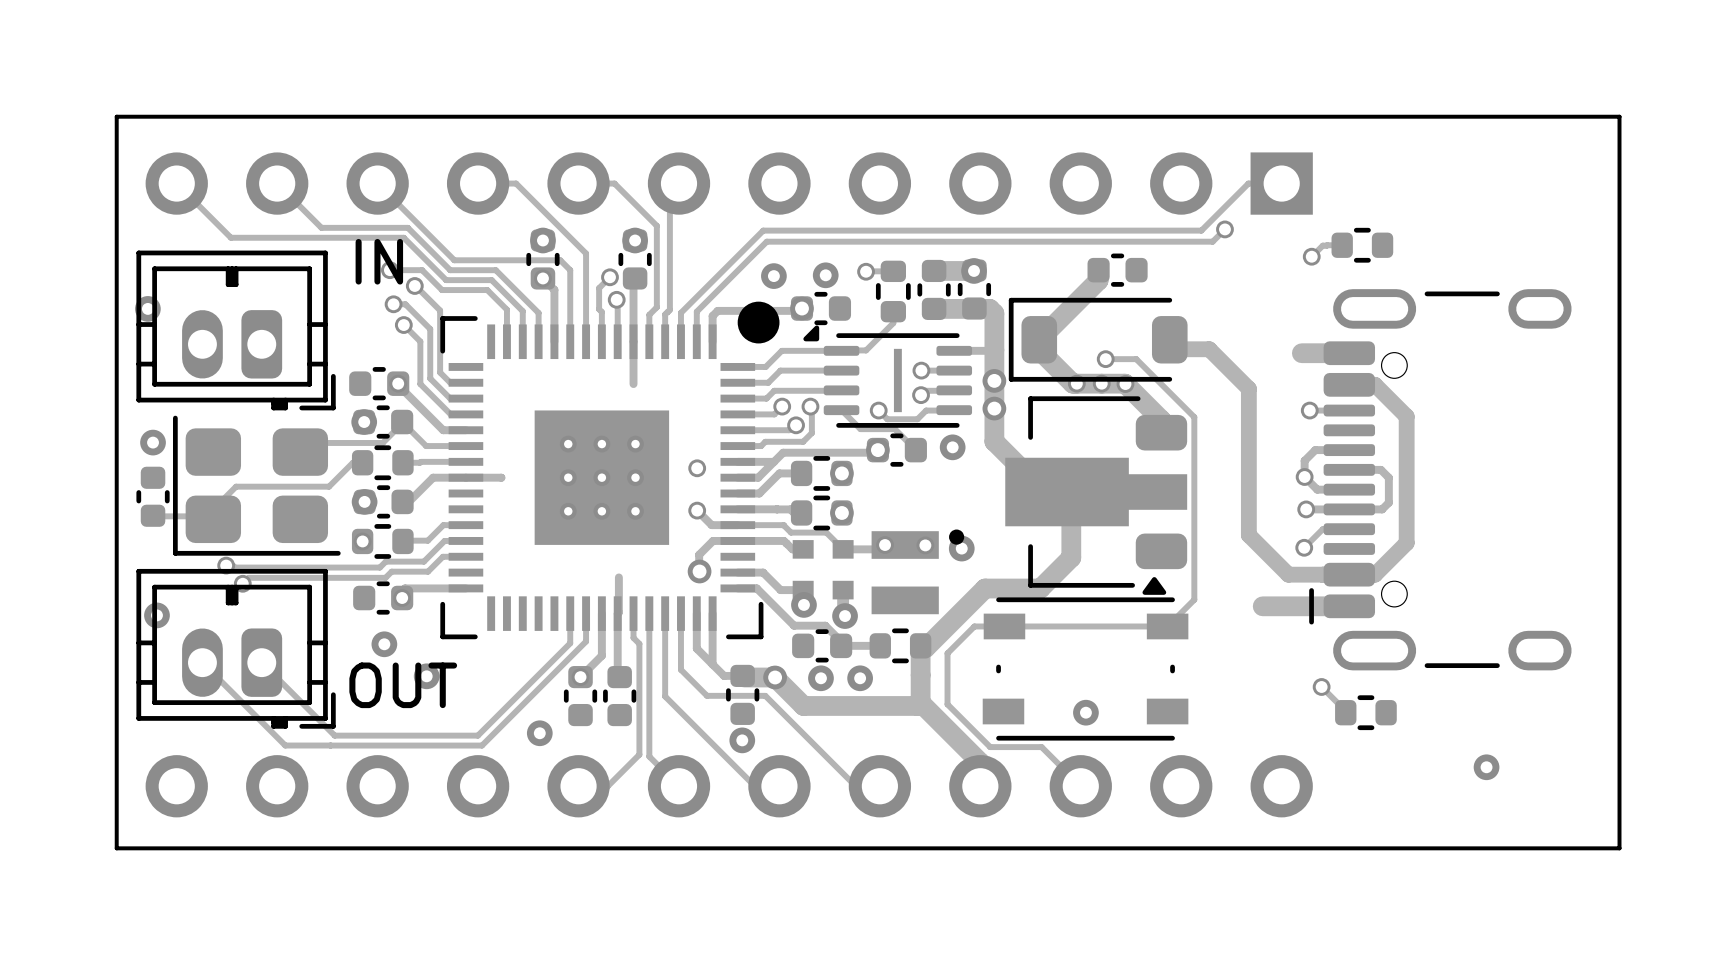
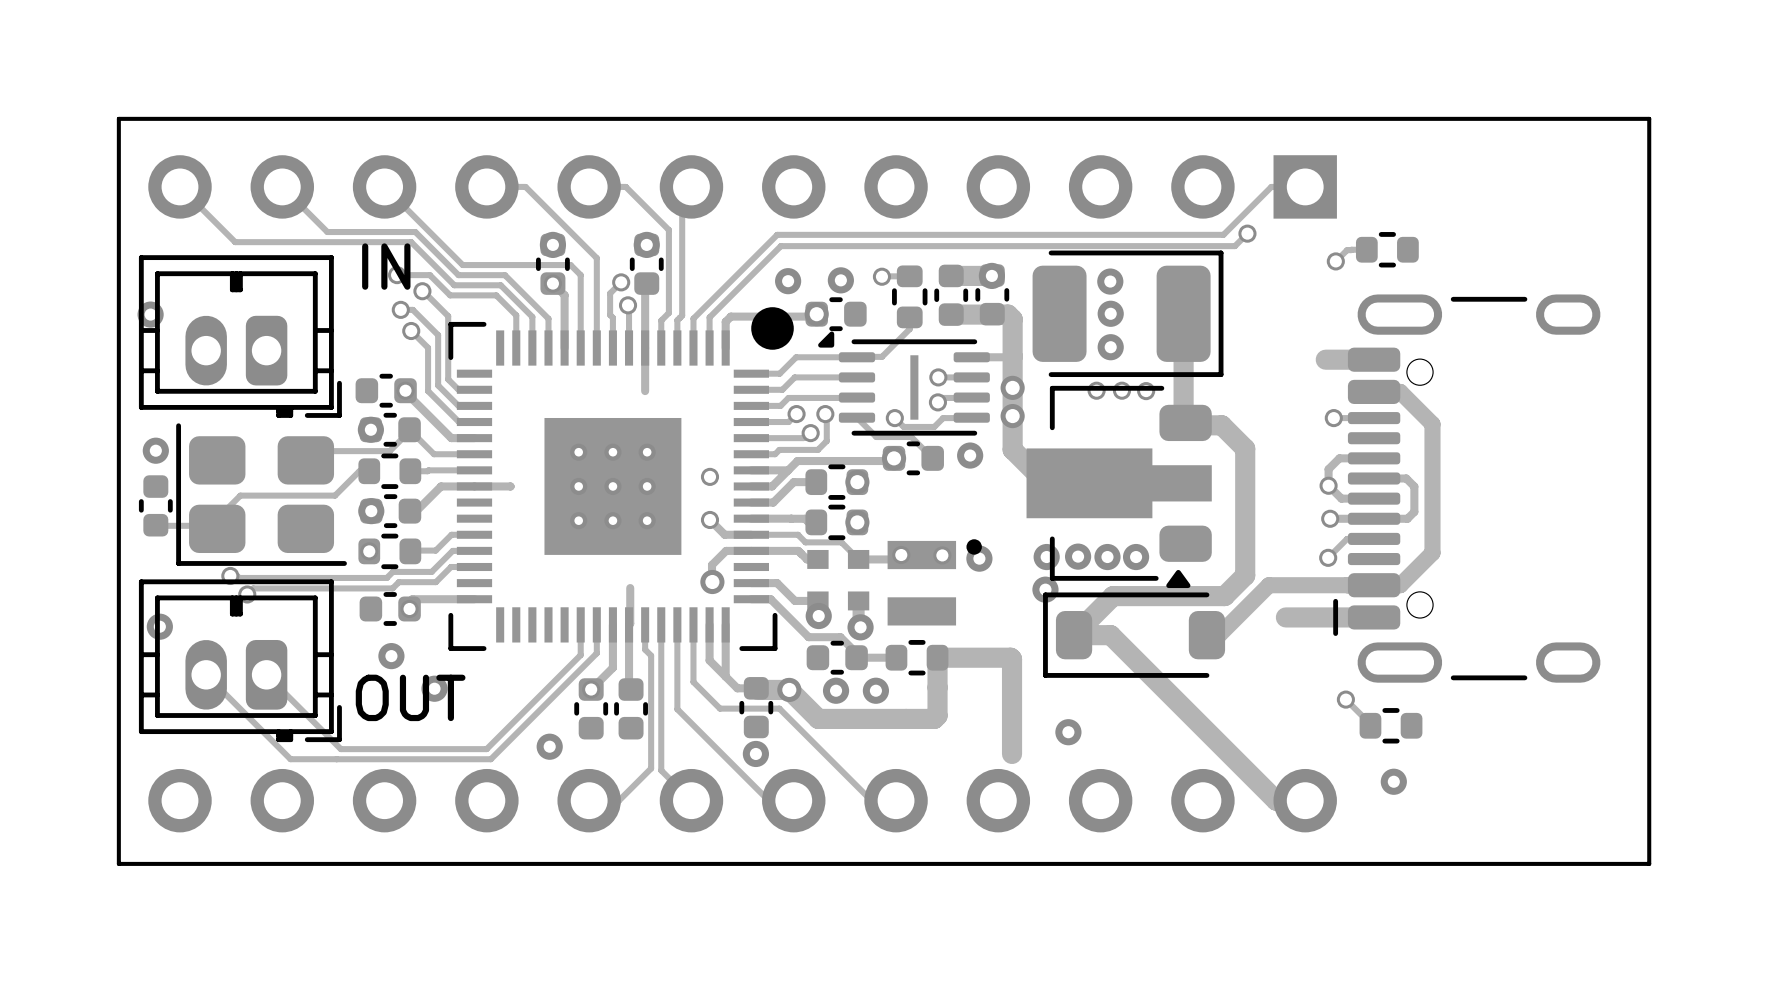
track: (1098, 270) (1098, 280) (1039, 339) (1039, 350) (1072, 383) (1125, 383) (1161, 420) (1161, 432) -> none
part: (1117, 270) -> none
via: none -> (1110, 281)
via: none -> (1110, 313)
part: none -> (1128, 313)
track: none -> (1183, 313) (1183, 420) (1188, 425) (1221, 425) (1245, 448) (1245, 575) (1224, 596) (1113, 596) (1074, 635) (1110, 635) (1276, 800) (1305, 800)
part position: (1098, 339) -> (1134, 635)
track: (1169, 339) (1179, 349) (1209, 349) (1248, 388) (1248, 535) (1288, 574) -> (1206, 635) (1219, 635) (1268, 585) (1312, 585)
track: (1105, 359) (1136, 359) (1194, 417) (1194, 599) (1167, 626) (974, 626) (947, 653) (947, 704) (990, 747) (1041, 747) (1080, 786) -> none
via position: (1105, 359) -> (1110, 347)
part position: (1096, 495) -> (1119, 486)
track: (1071, 501) (1071, 557) (1040, 588) (985, 588) (924, 648) (920, 645) -> (1012, 753) (1012, 659) (937, 657)
via: none -> (1046, 557)
via: none -> (1078, 556)
via: none -> (1107, 557)
via: none -> (1136, 557)
via: none -> (1045, 589)
part: (1085, 668) -> none
track: (920, 702) (980, 762) (980, 786) -> none
via position: (1085, 712) -> (1068, 732)
via position: (1486, 767) -> (1393, 781)

